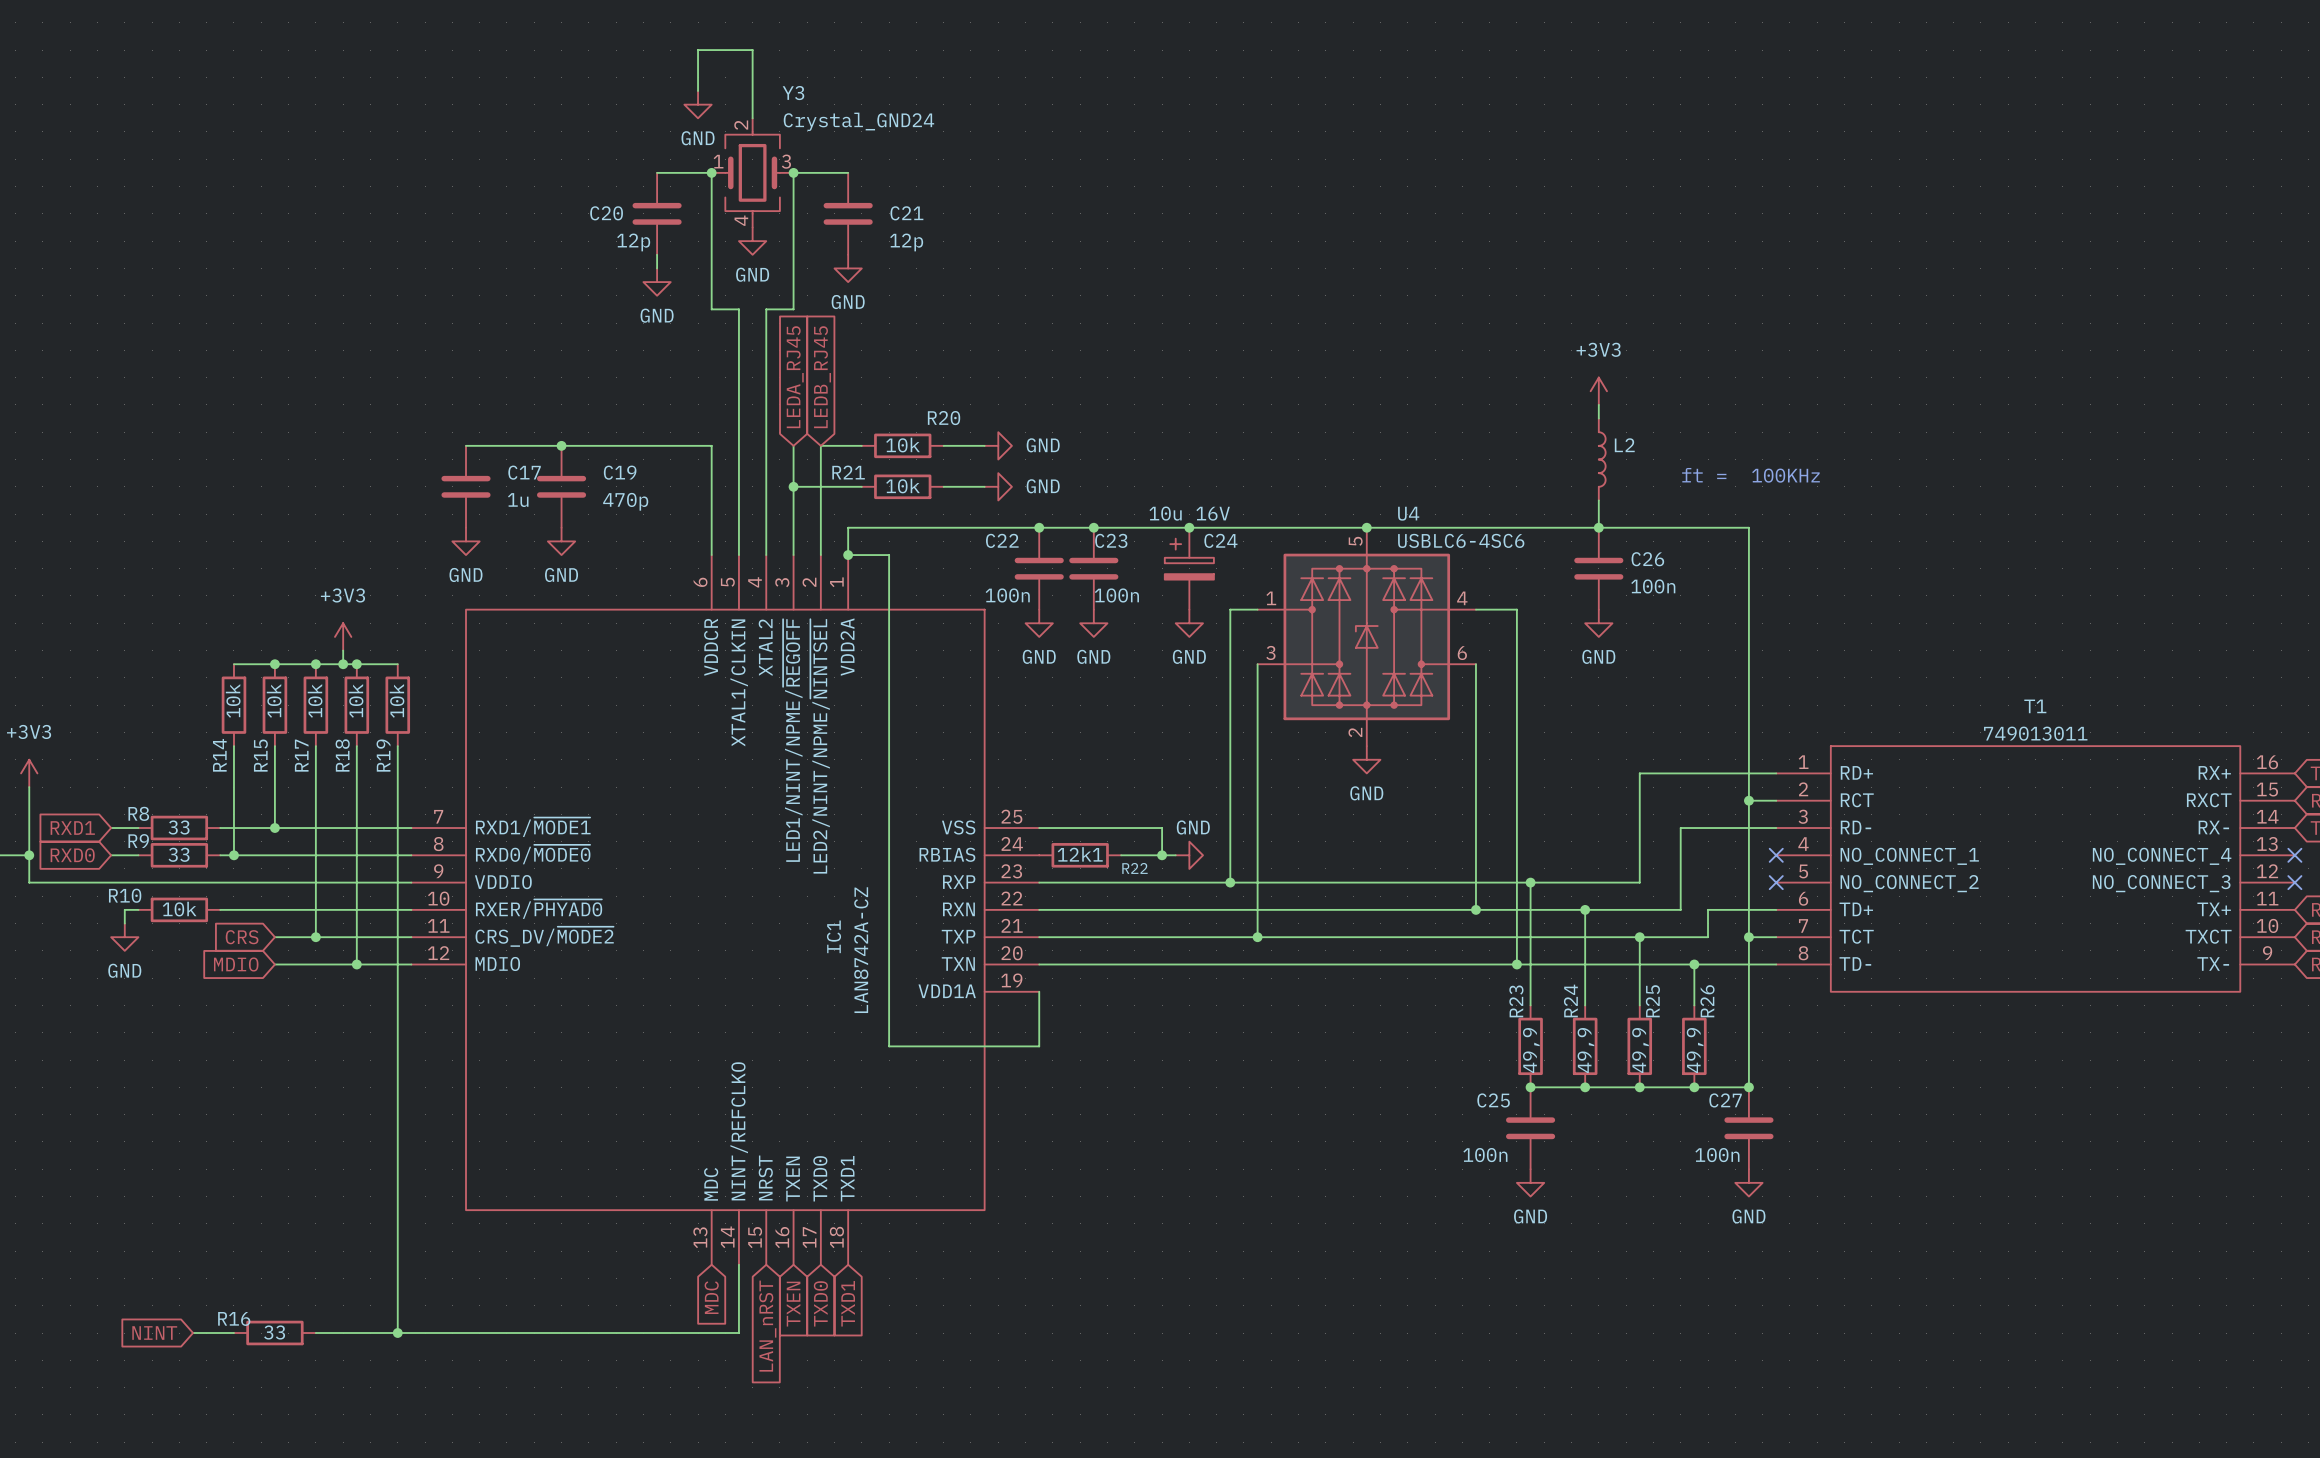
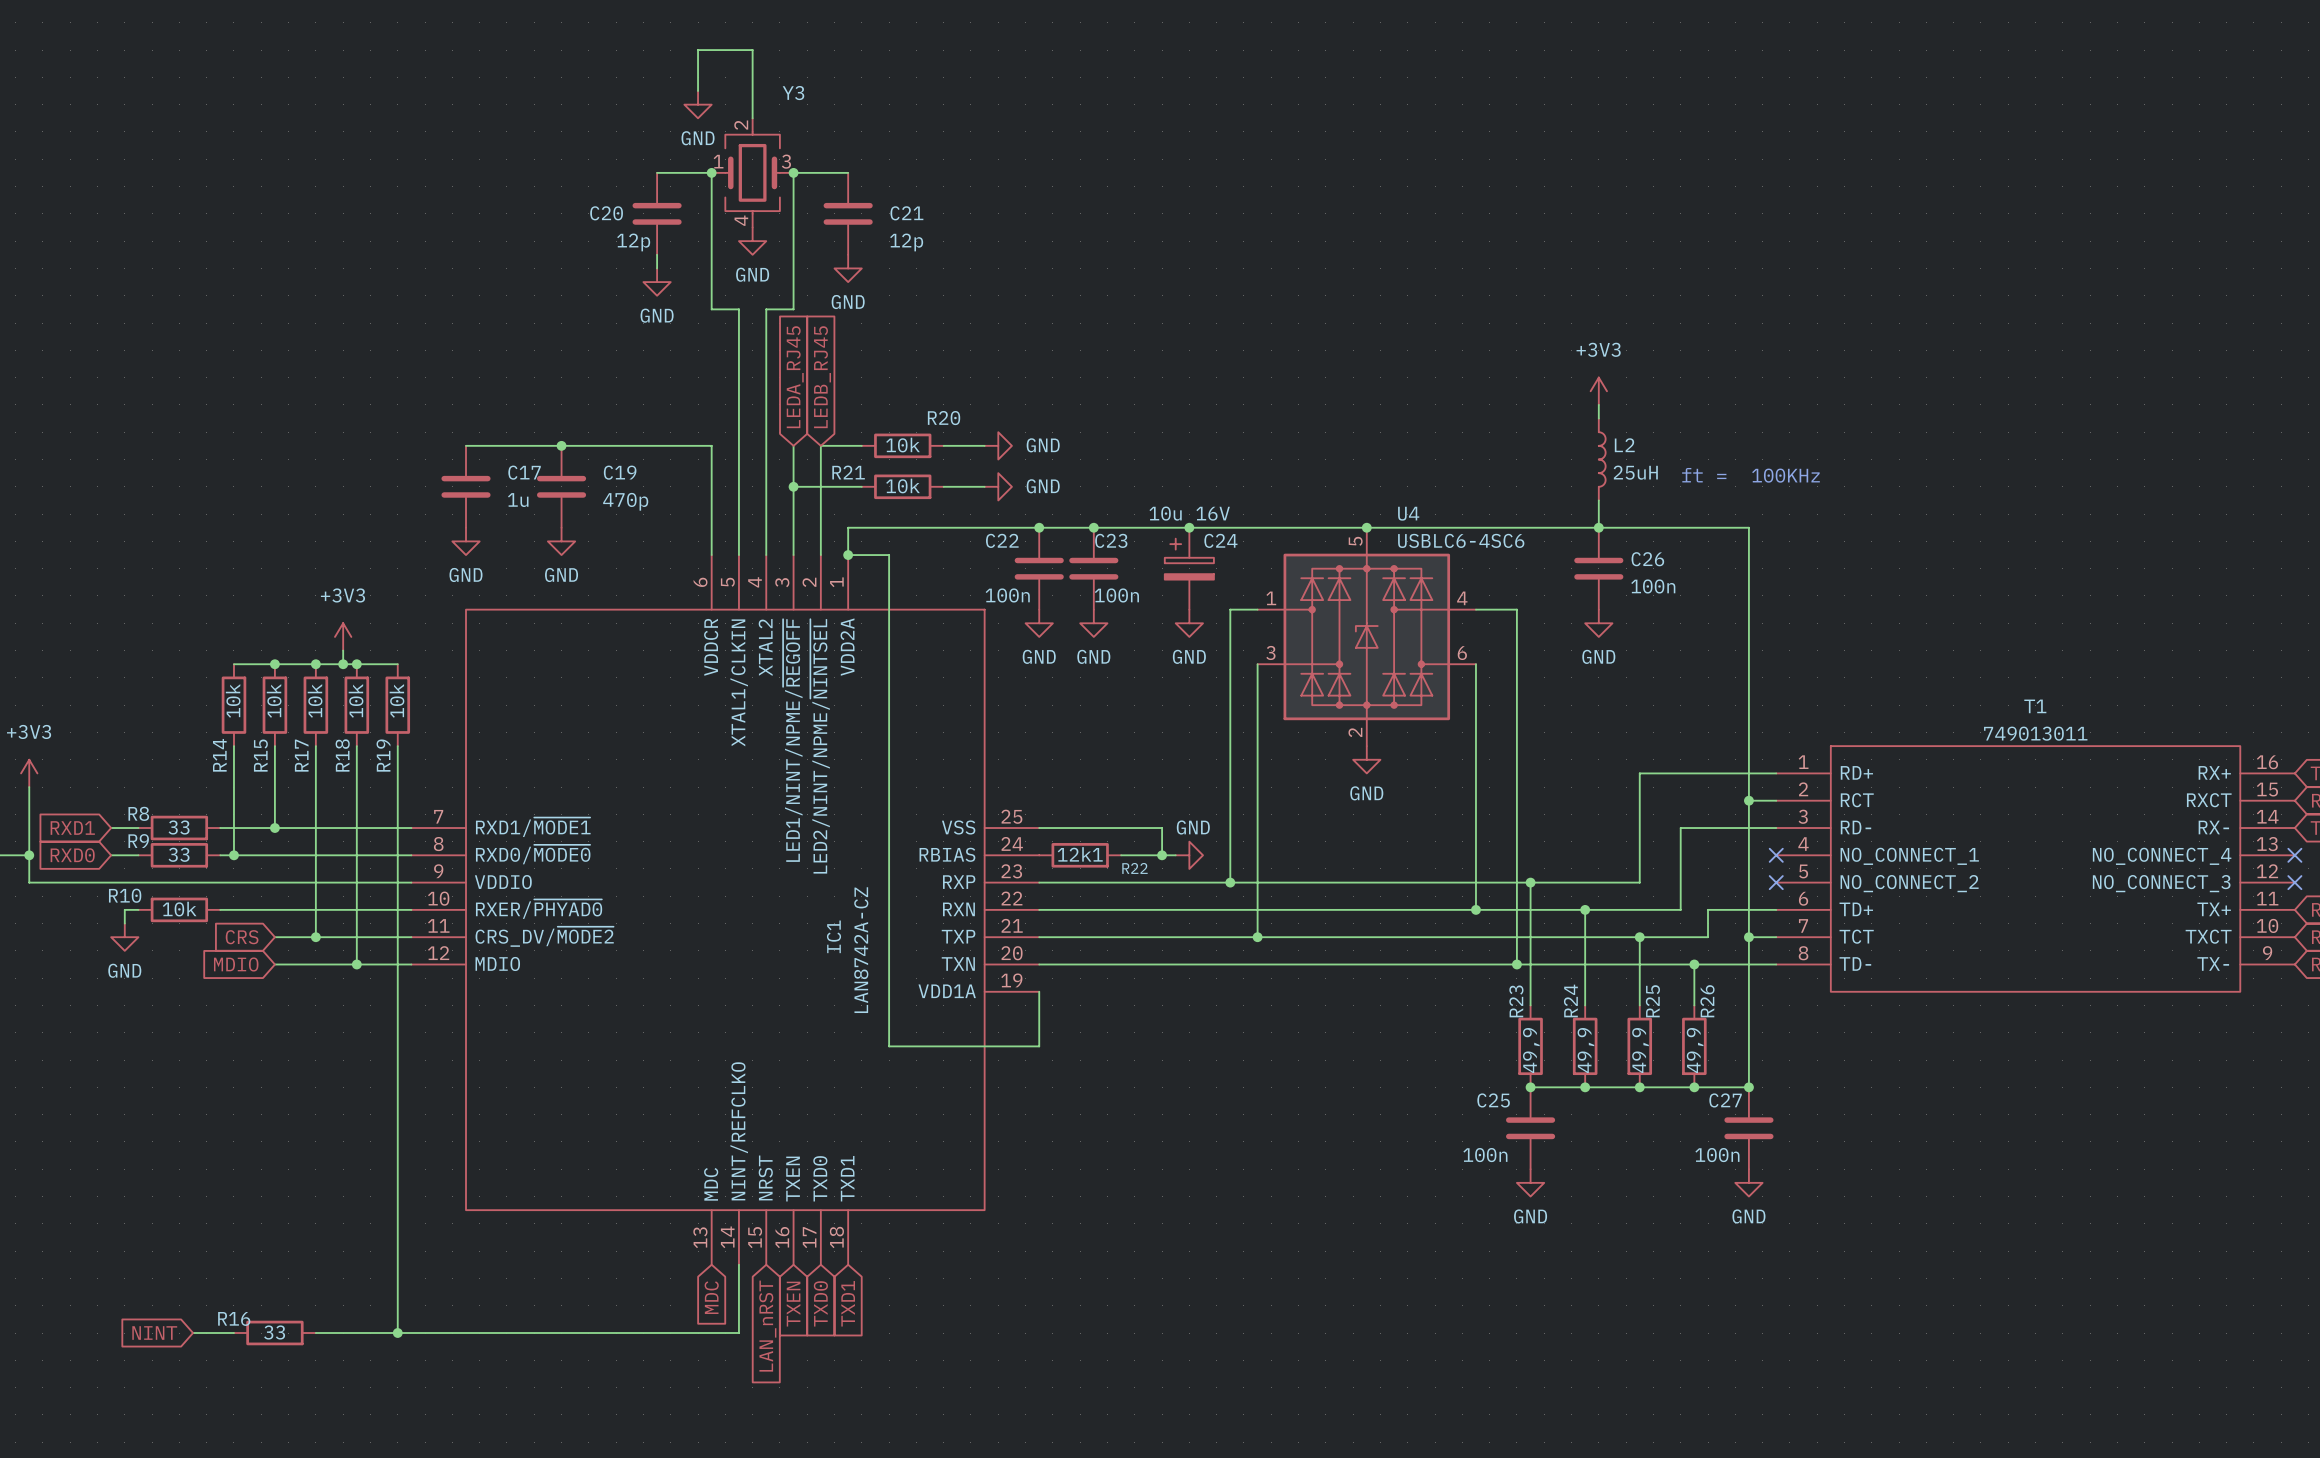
Y3 value: Crystal_GND24 (858, 121) -> none
L2 value: none -> 25uH (1635, 472)

